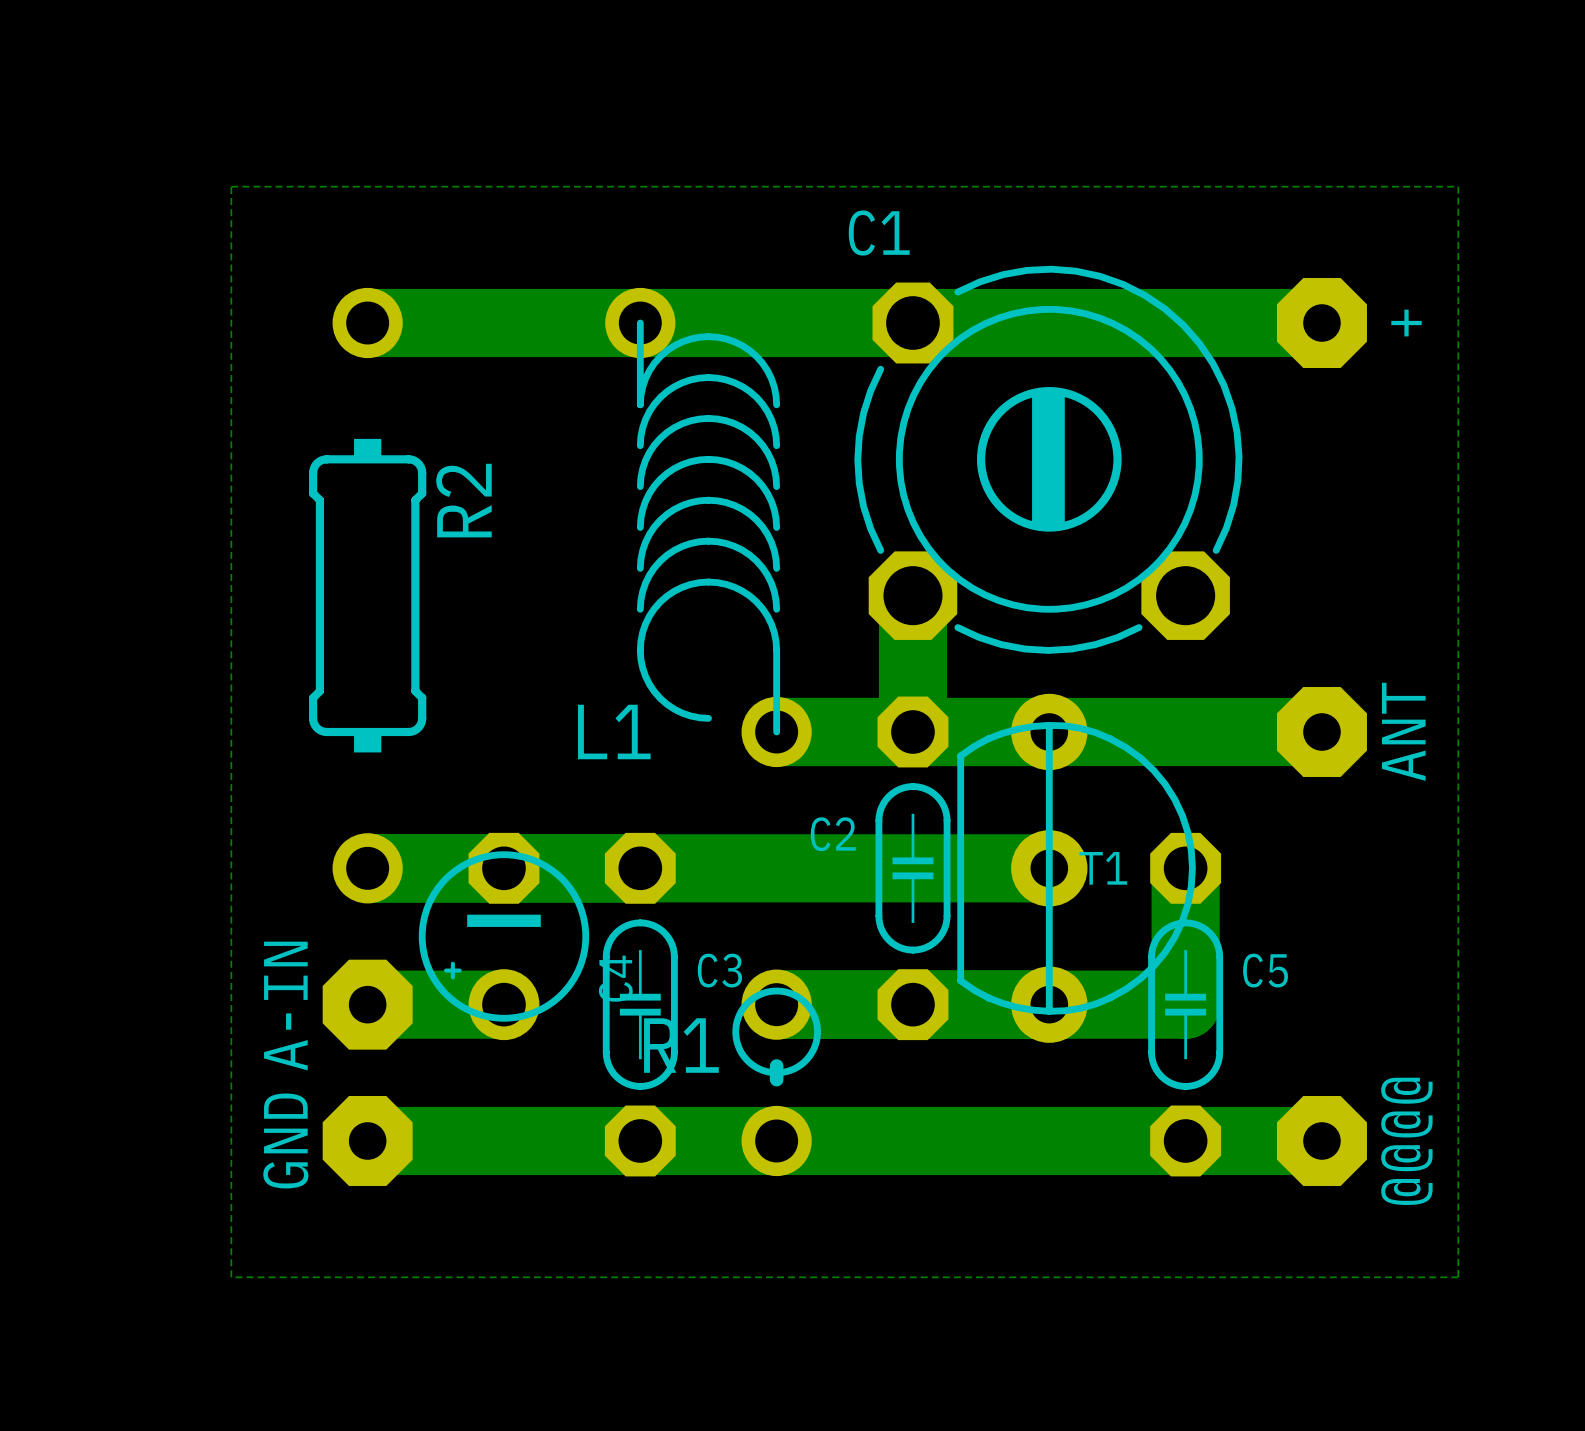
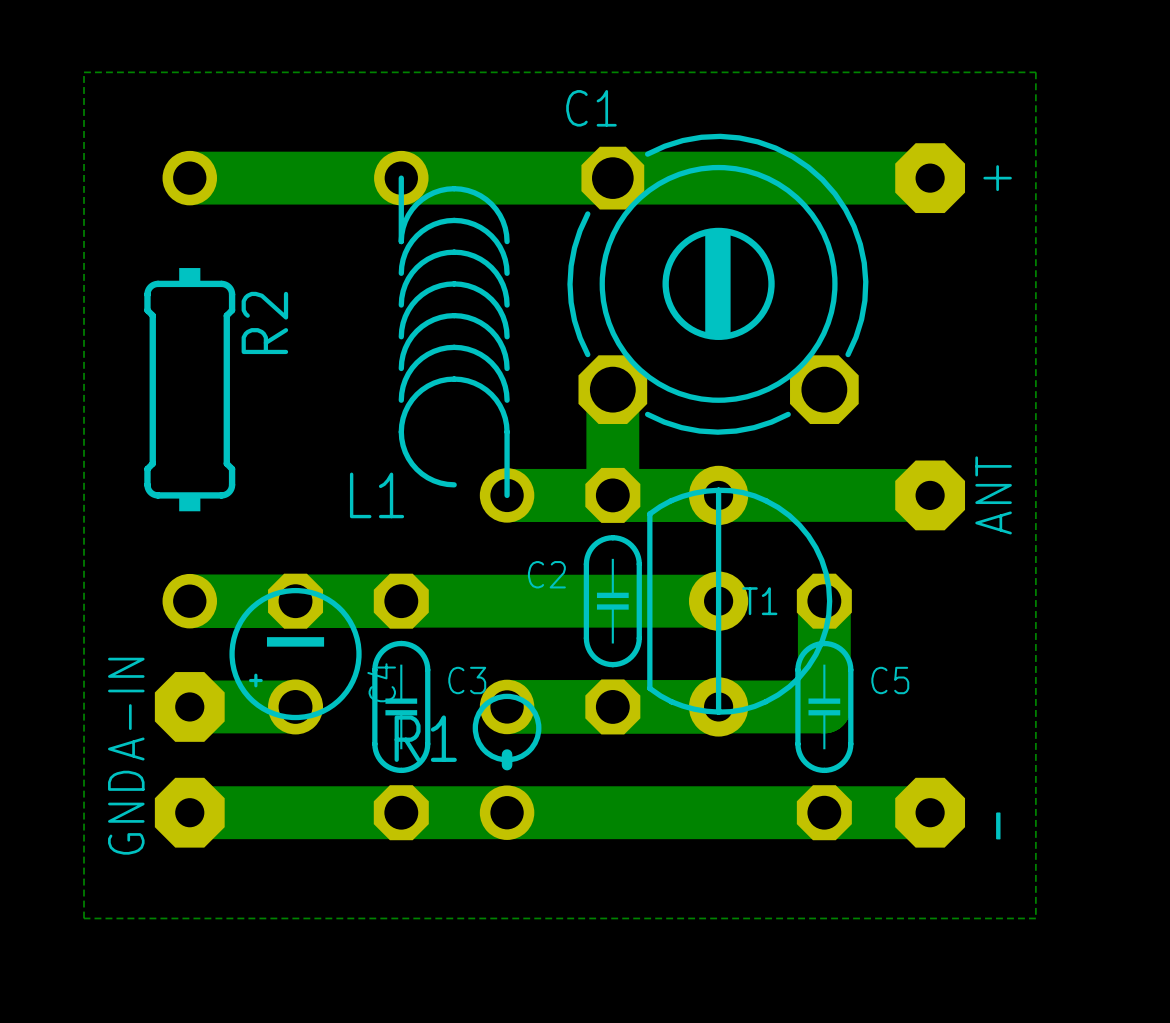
part name: @@@@ (1406, 1141) -> ̶̶ (998, 825)

